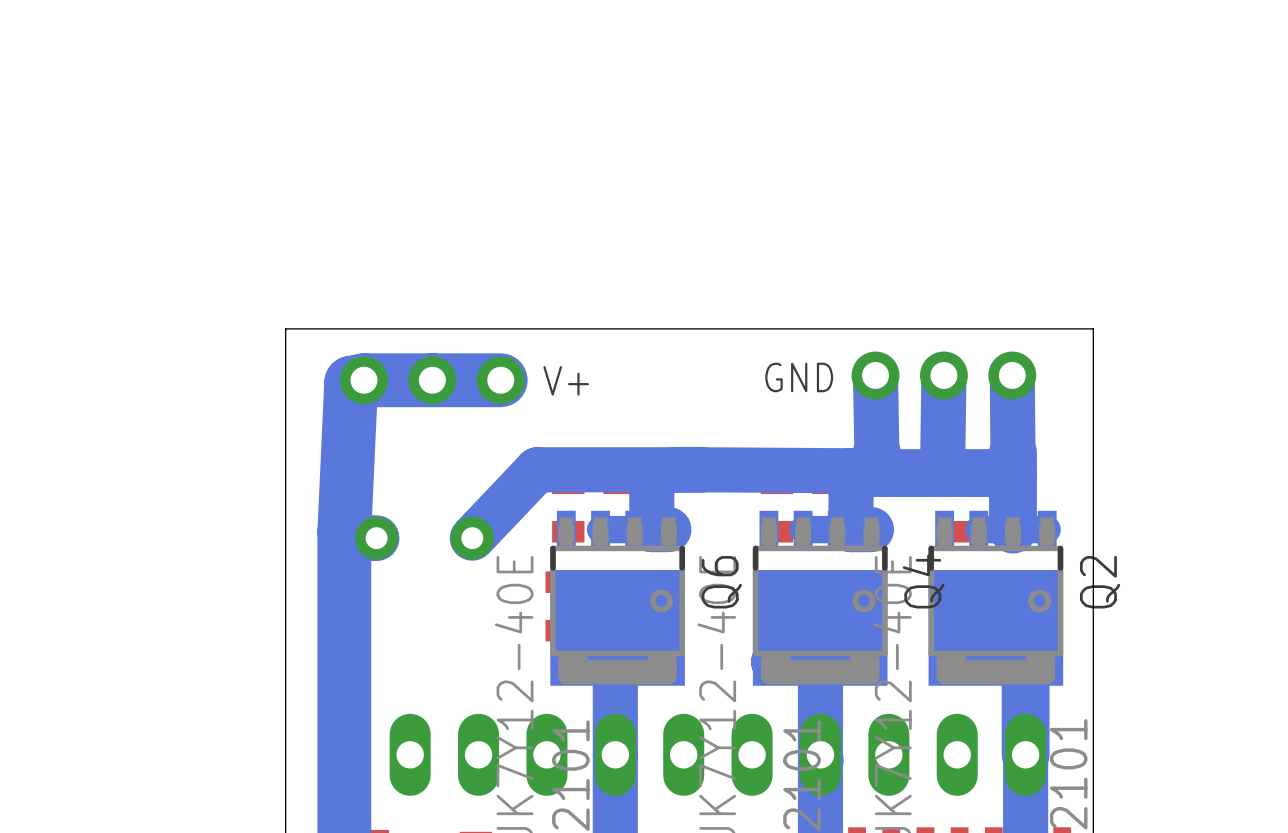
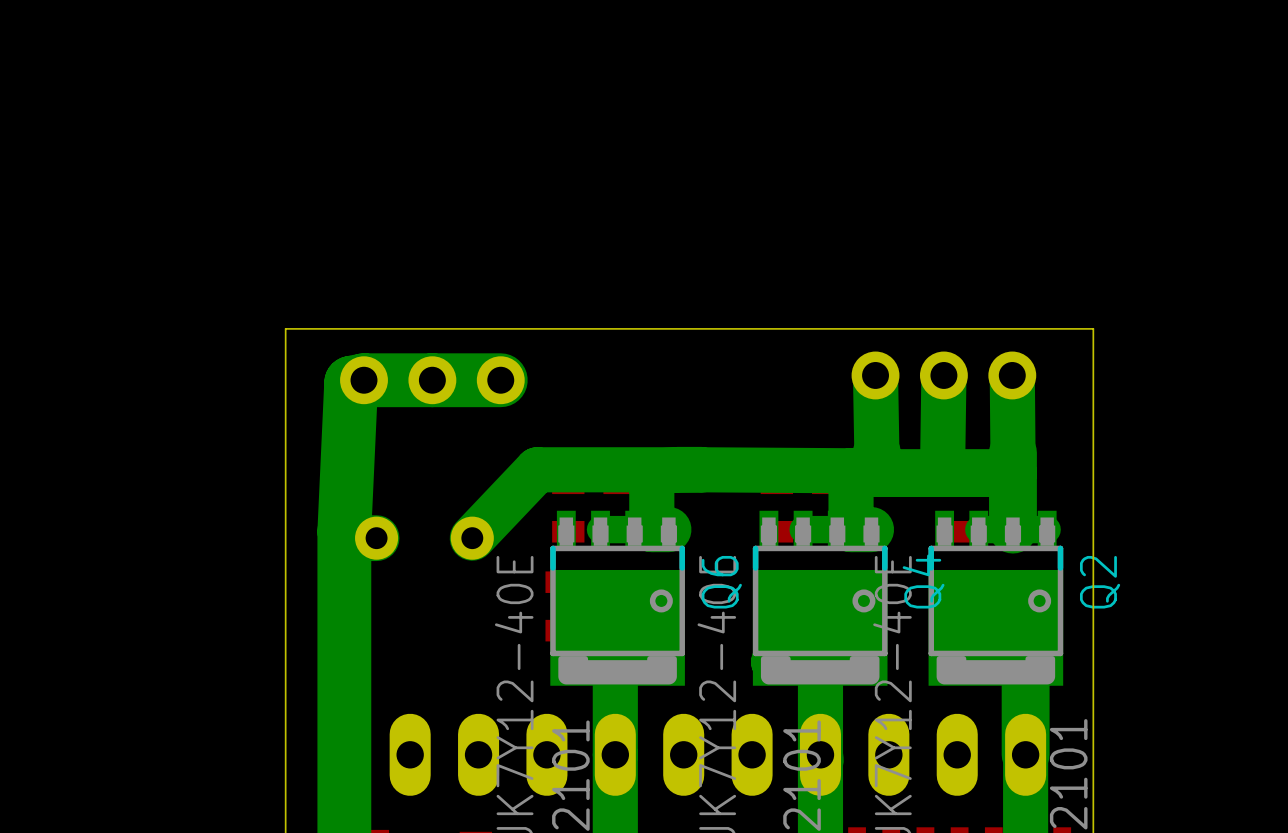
text: GND (799, 377) -> none
text: V+ (566, 380) -> none

